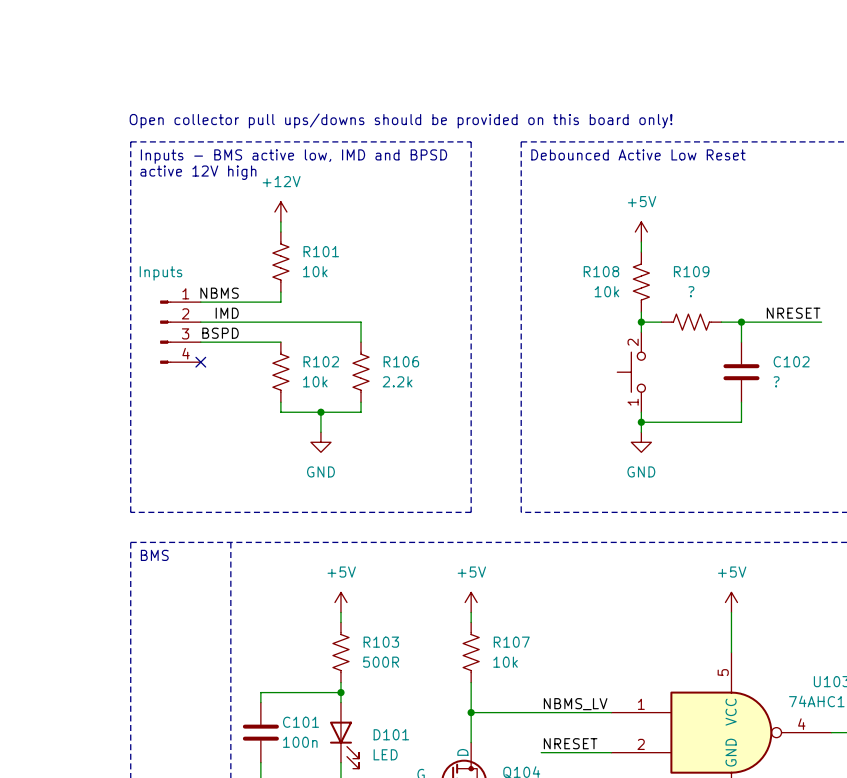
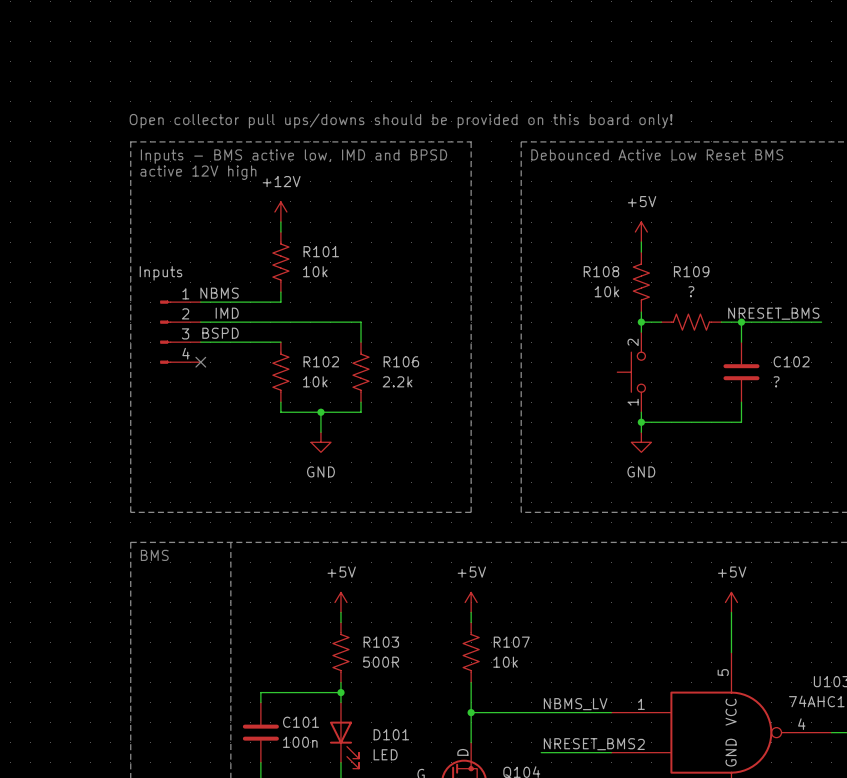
text: Debounced Active Low Reset (638, 154) -> Debounced Active Low Reset BMS (657, 154)
label: NRESET (793, 313) -> NRESET_BMS (773, 313)
label: NRESET (570, 743) -> NRESET_BMS (589, 744)

